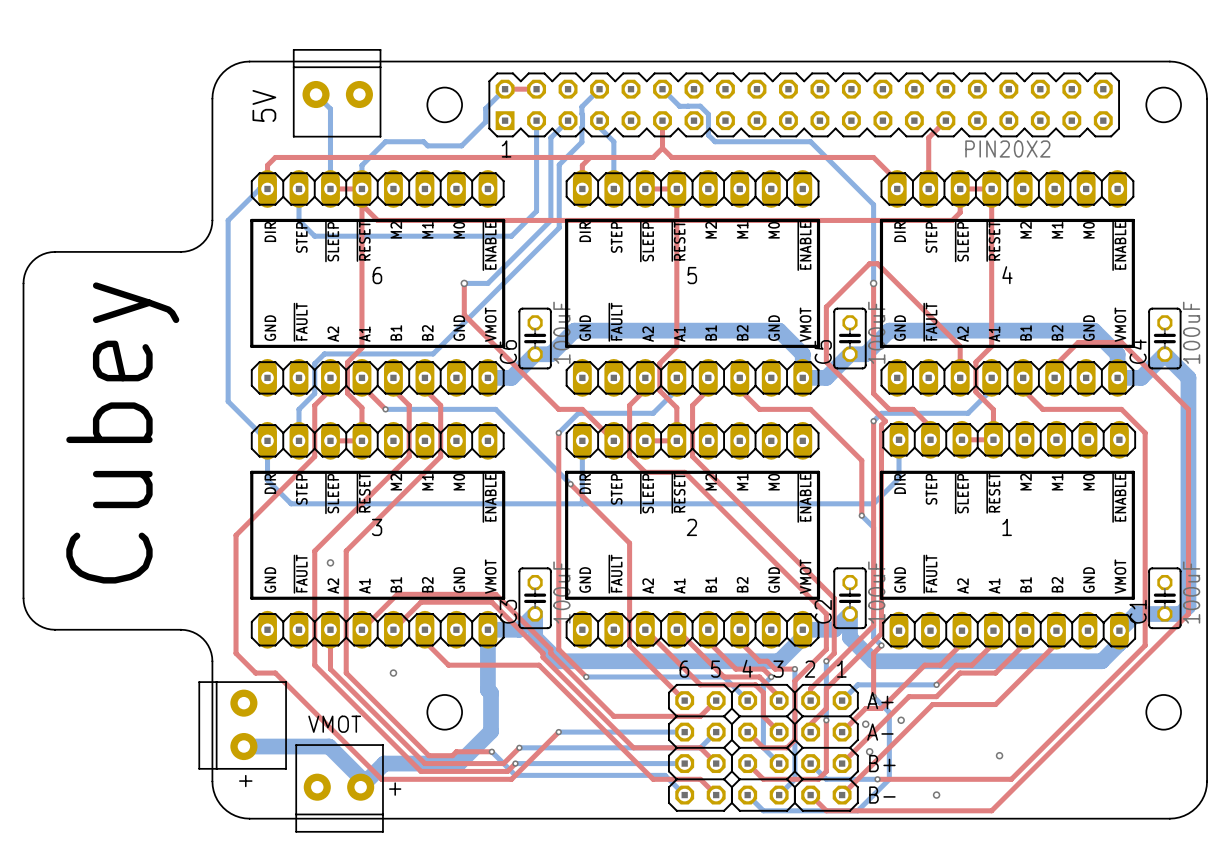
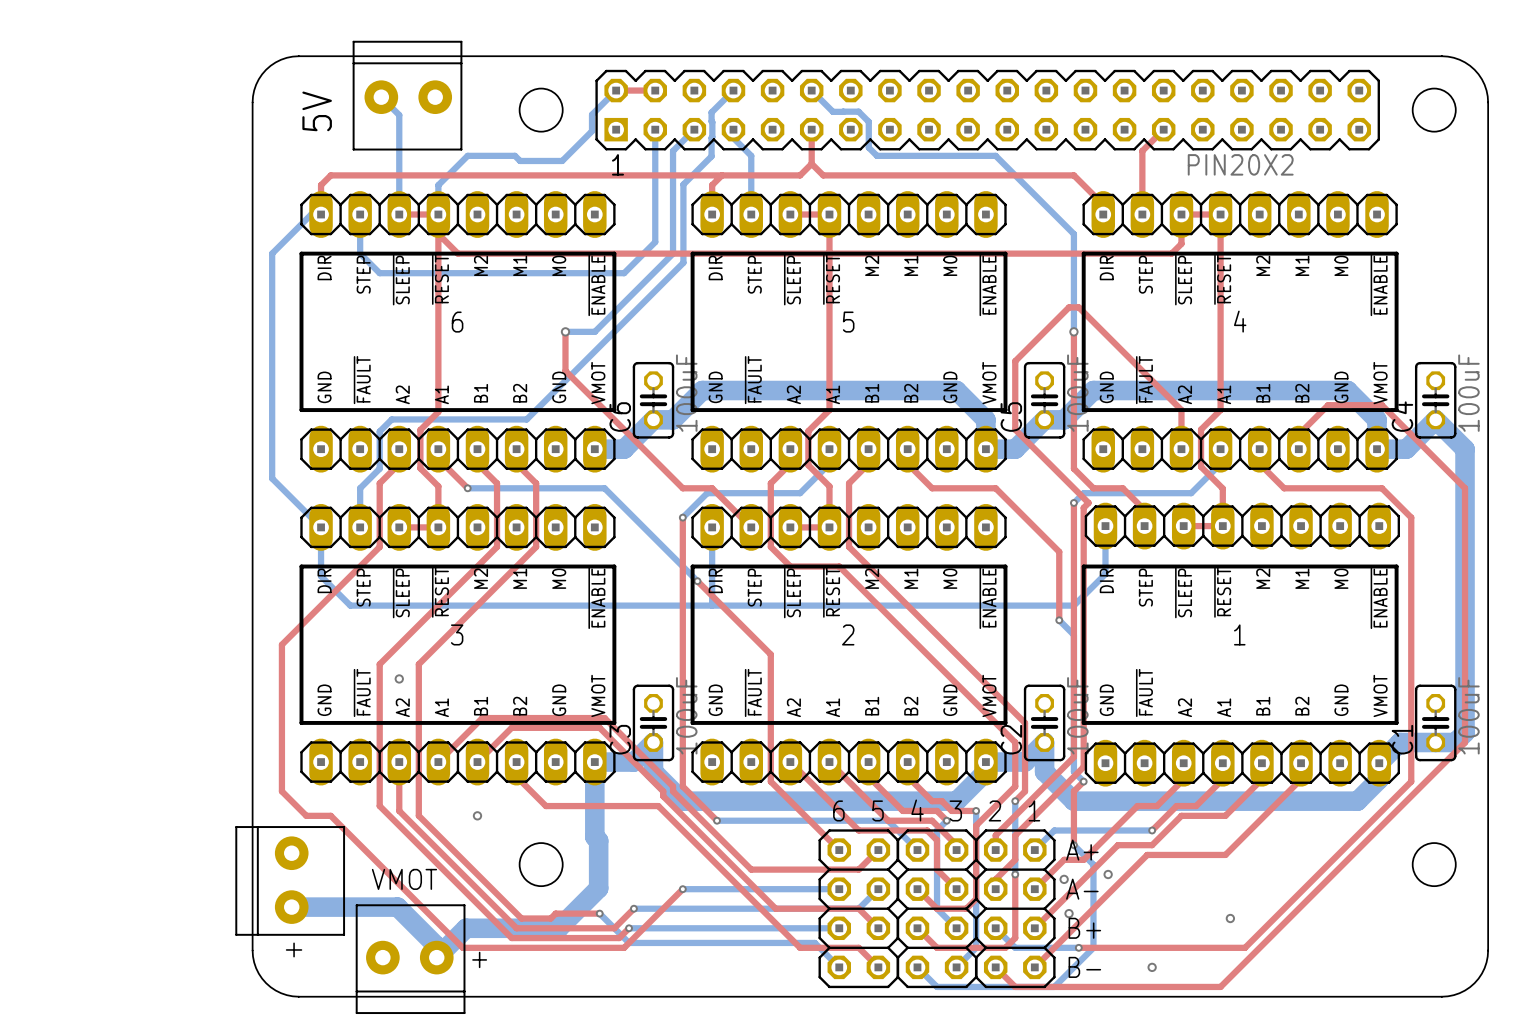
board edge: (212, 220) (211, 228) (205, 239) (200, 245) (189, 250) (50, 252) (42, 254) (32, 261) (25, 271) (23, 283) (23, 598) (27, 614) (35, 623) (50, 629) (189, 630) (200, 636) (205, 642) (211, 653) (212, 661) -> (252, 253) (252, 801)
text: Cubey (122, 432) -> none

